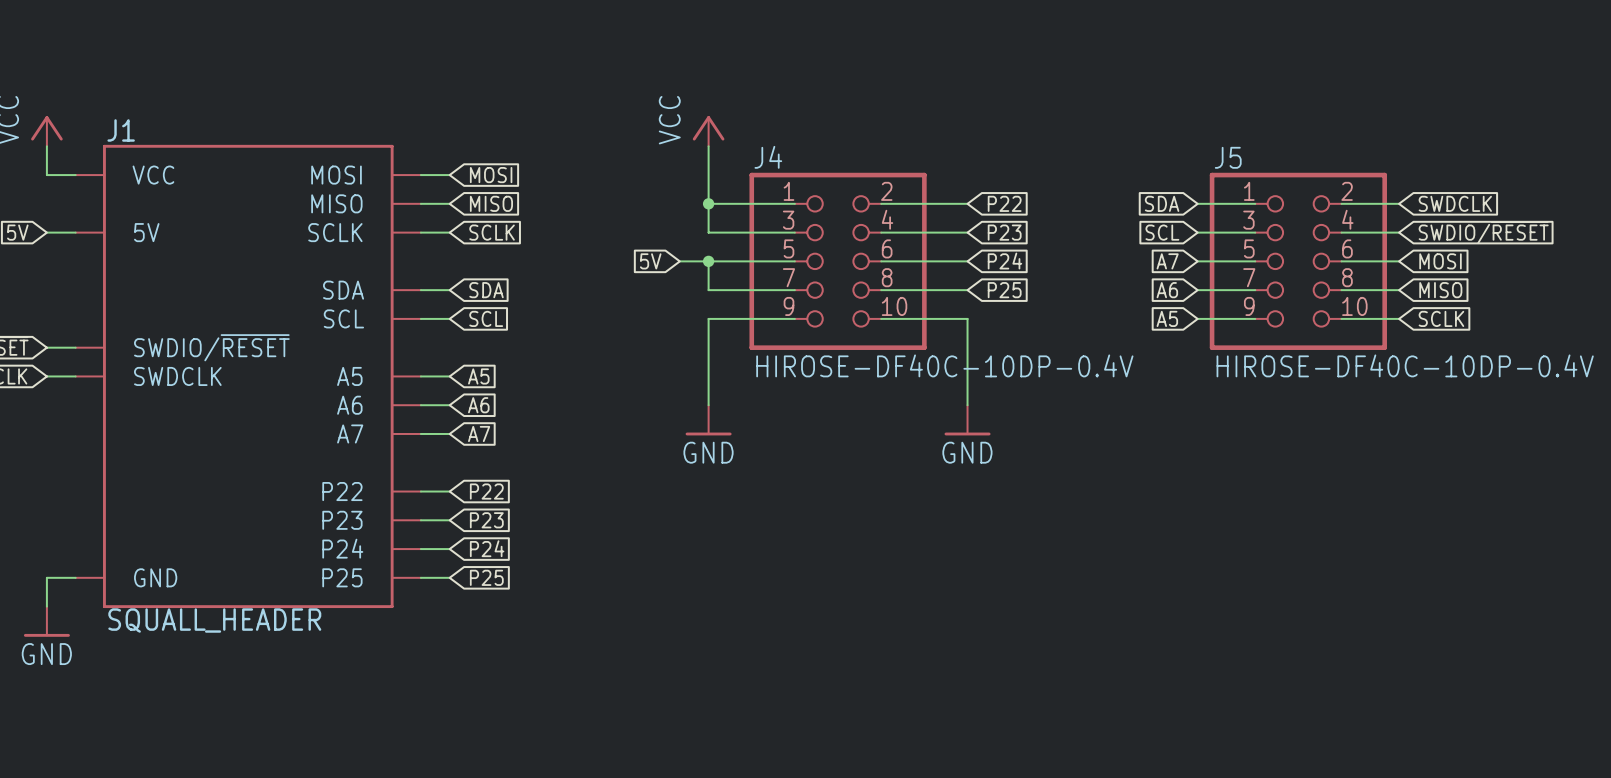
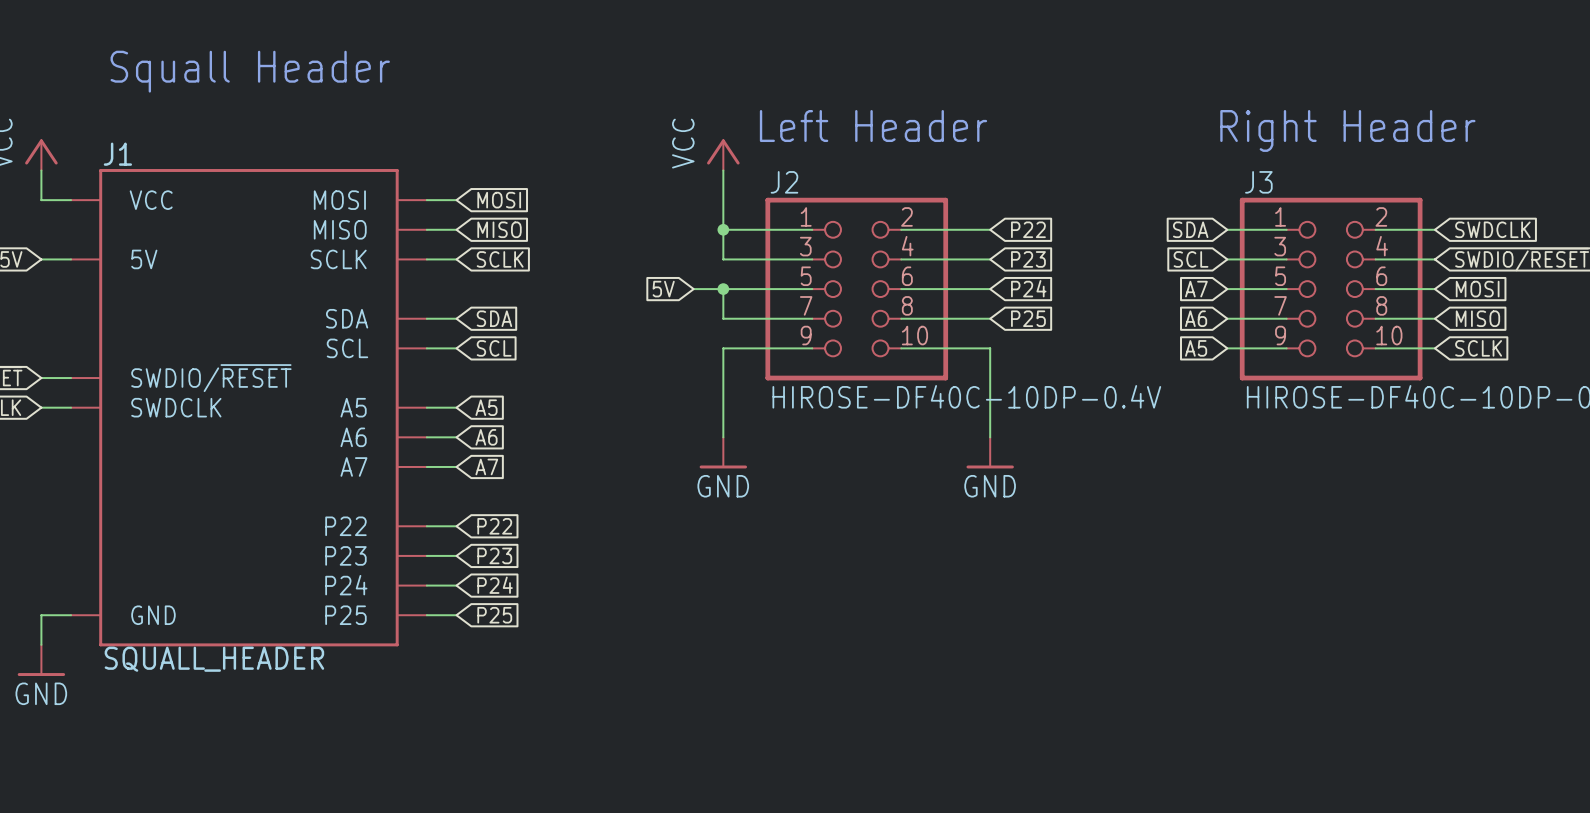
text: none -> Squall Header (250, 71)
text: none -> Left Header (873, 126)
text: none -> Right Header (1347, 130)
J4 name: J4 (768, 157) -> J2 (784, 182)
J5 name: J5 (1228, 157) -> J3 (1258, 182)

